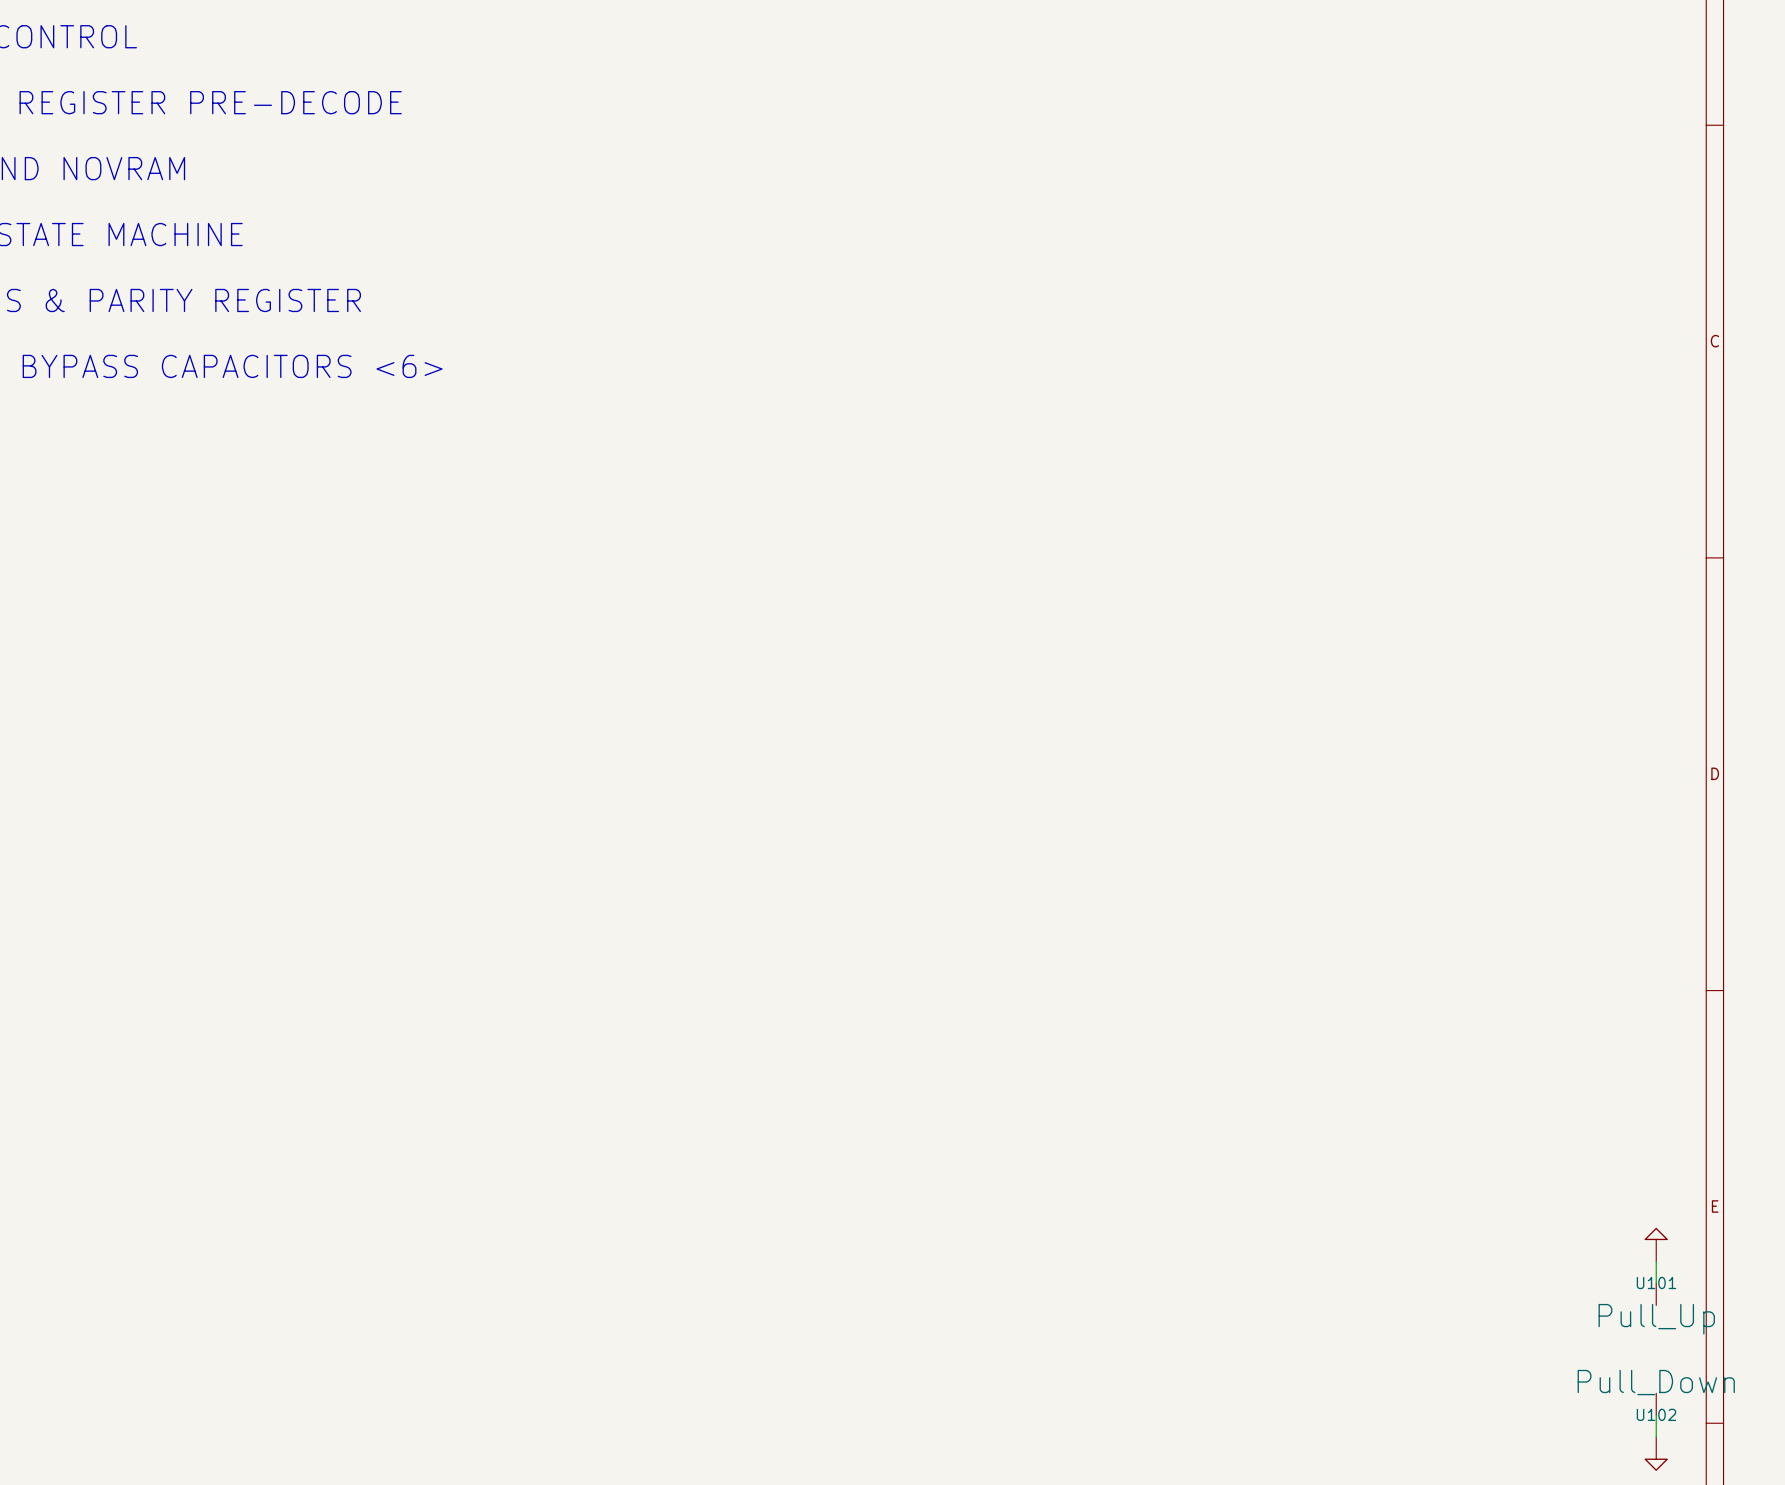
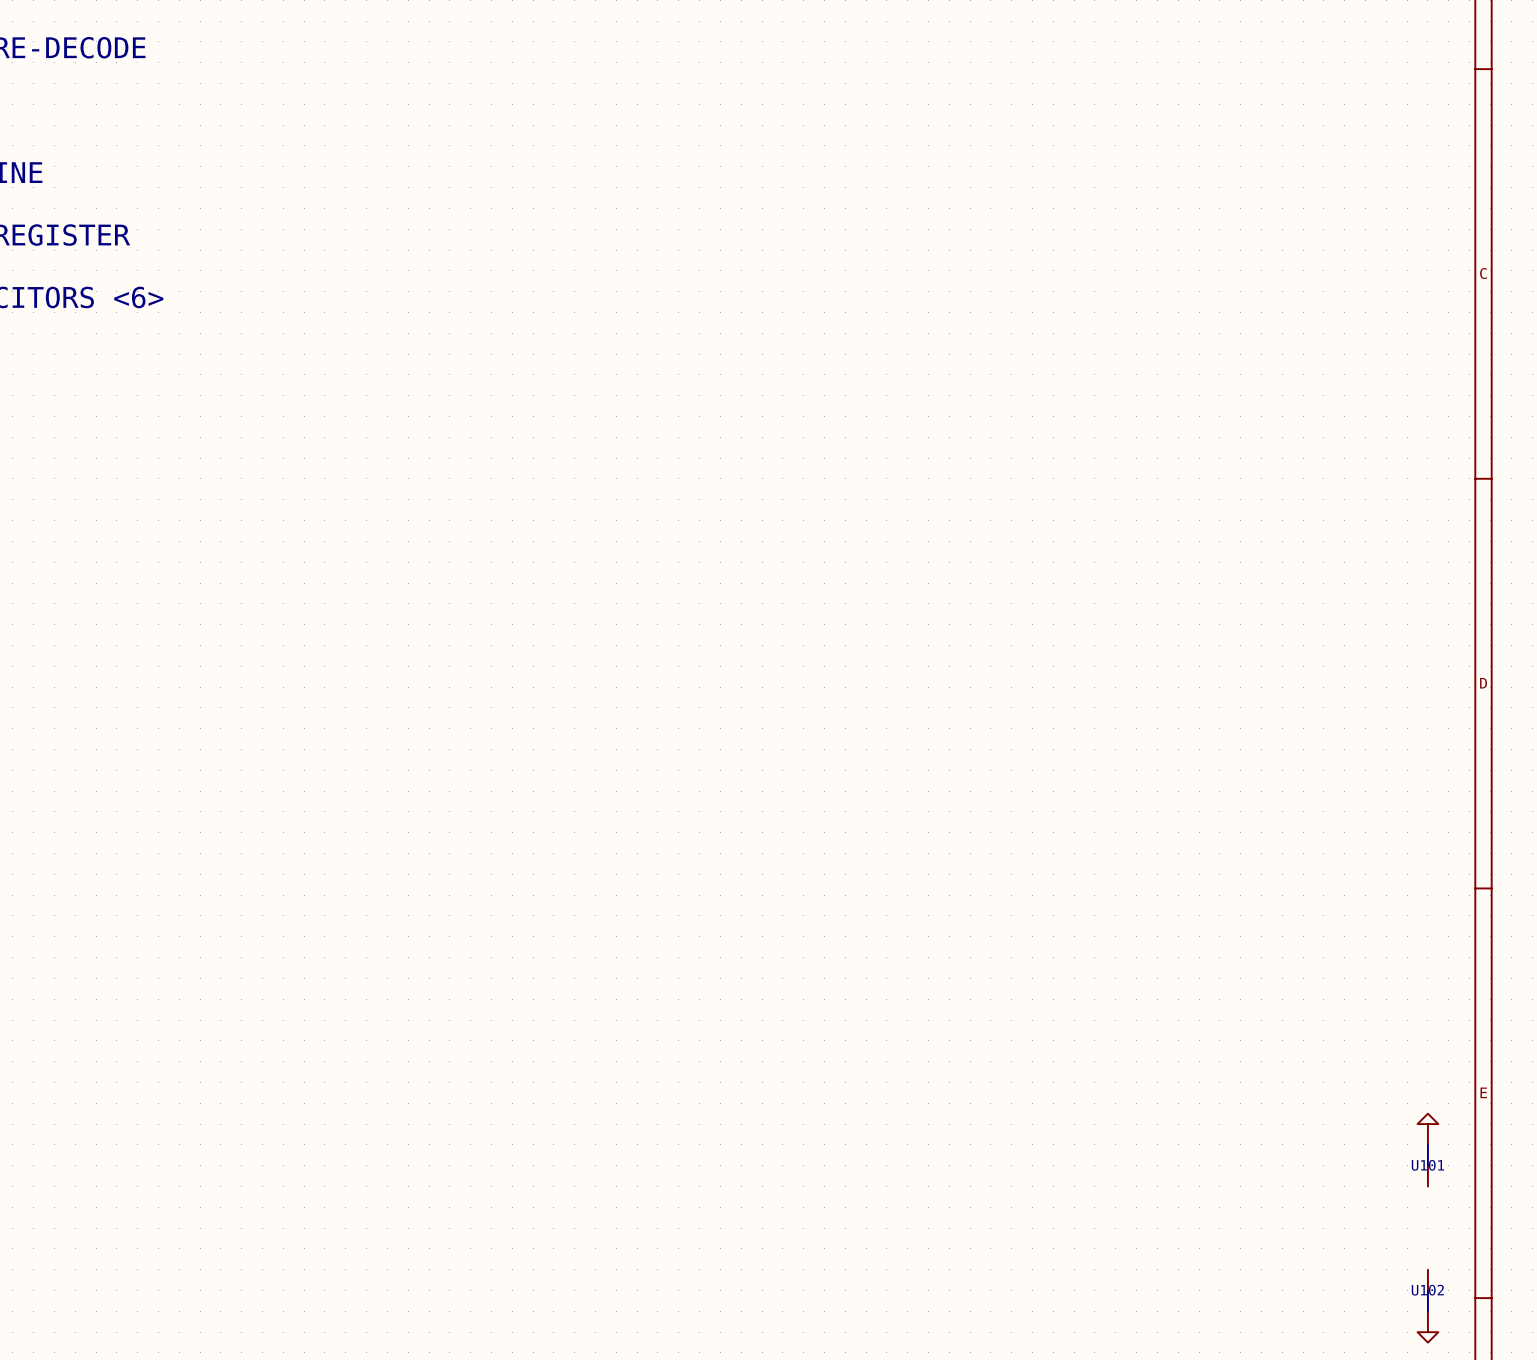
U101 value: Pull_Up (1656, 1319) -> none
U102 value: Pull_Down (1656, 1382) -> none

